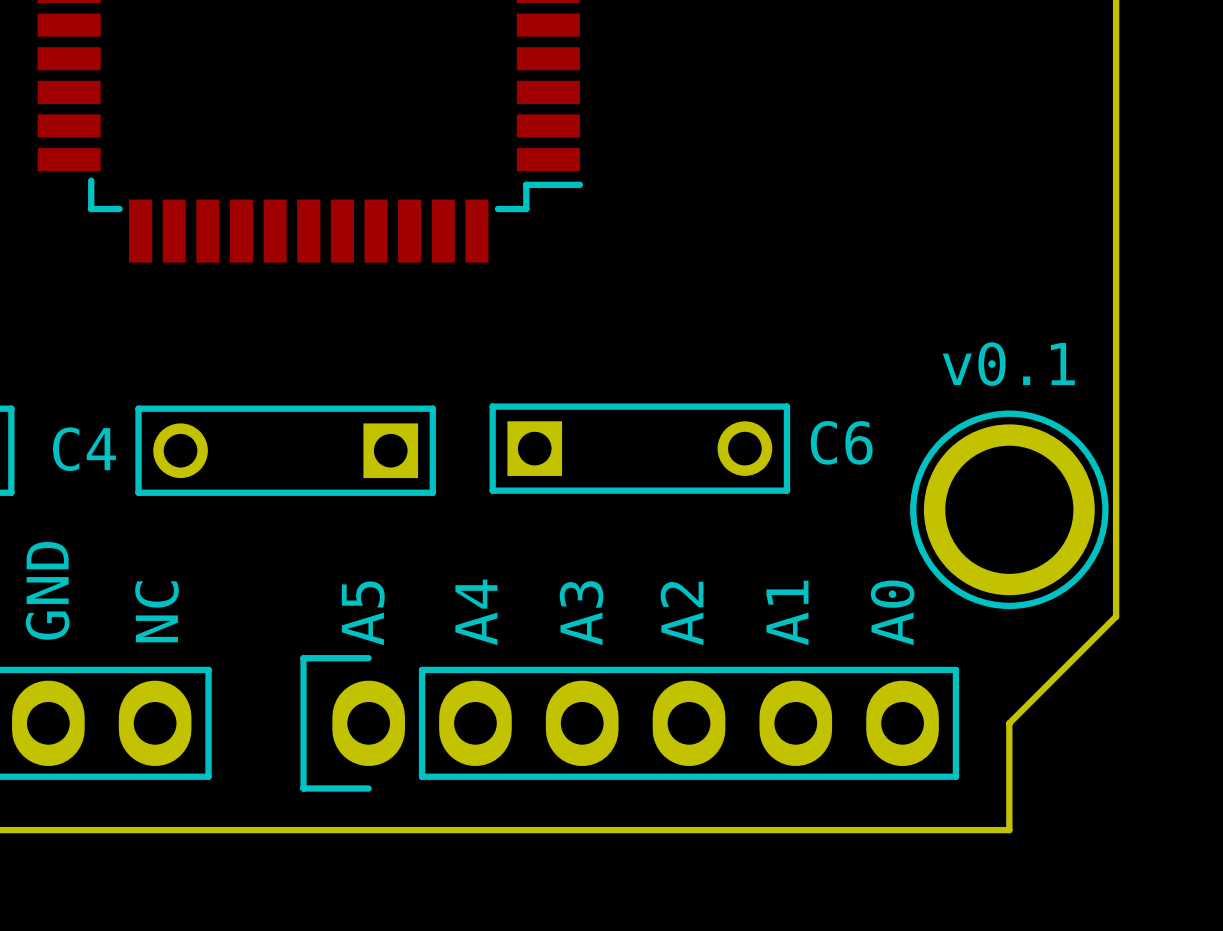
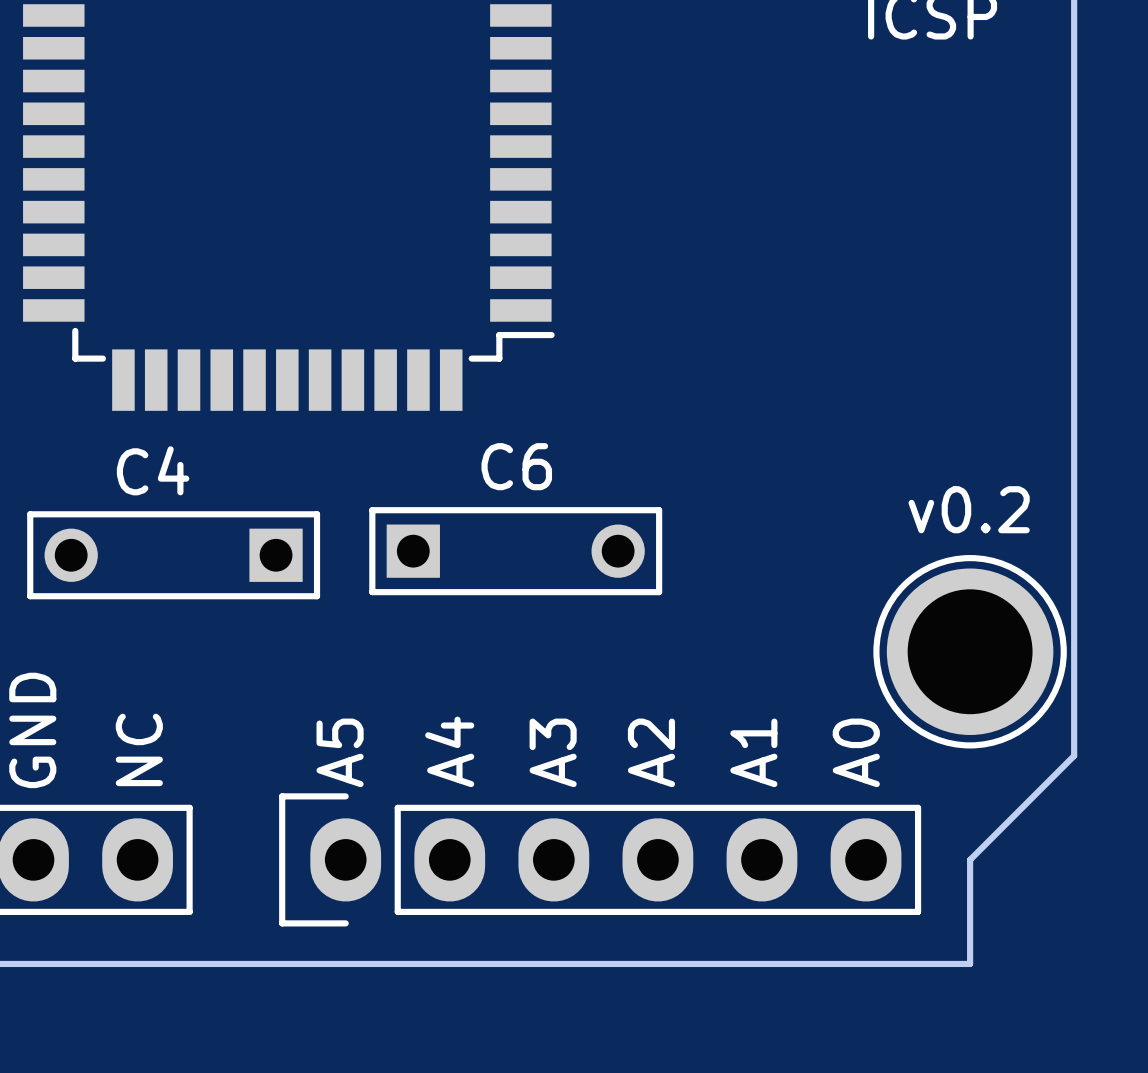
text: v0.1 (1008, 364) -> v0.2 (969, 509)
C6 name position: C6 (841, 442) -> C6 (516, 466)
C6 position: (639, 448) -> (515, 551)
C4 name position: C4 (84, 449) -> C4 (153, 470)
C4 position: (285, 450) -> (173, 555)

